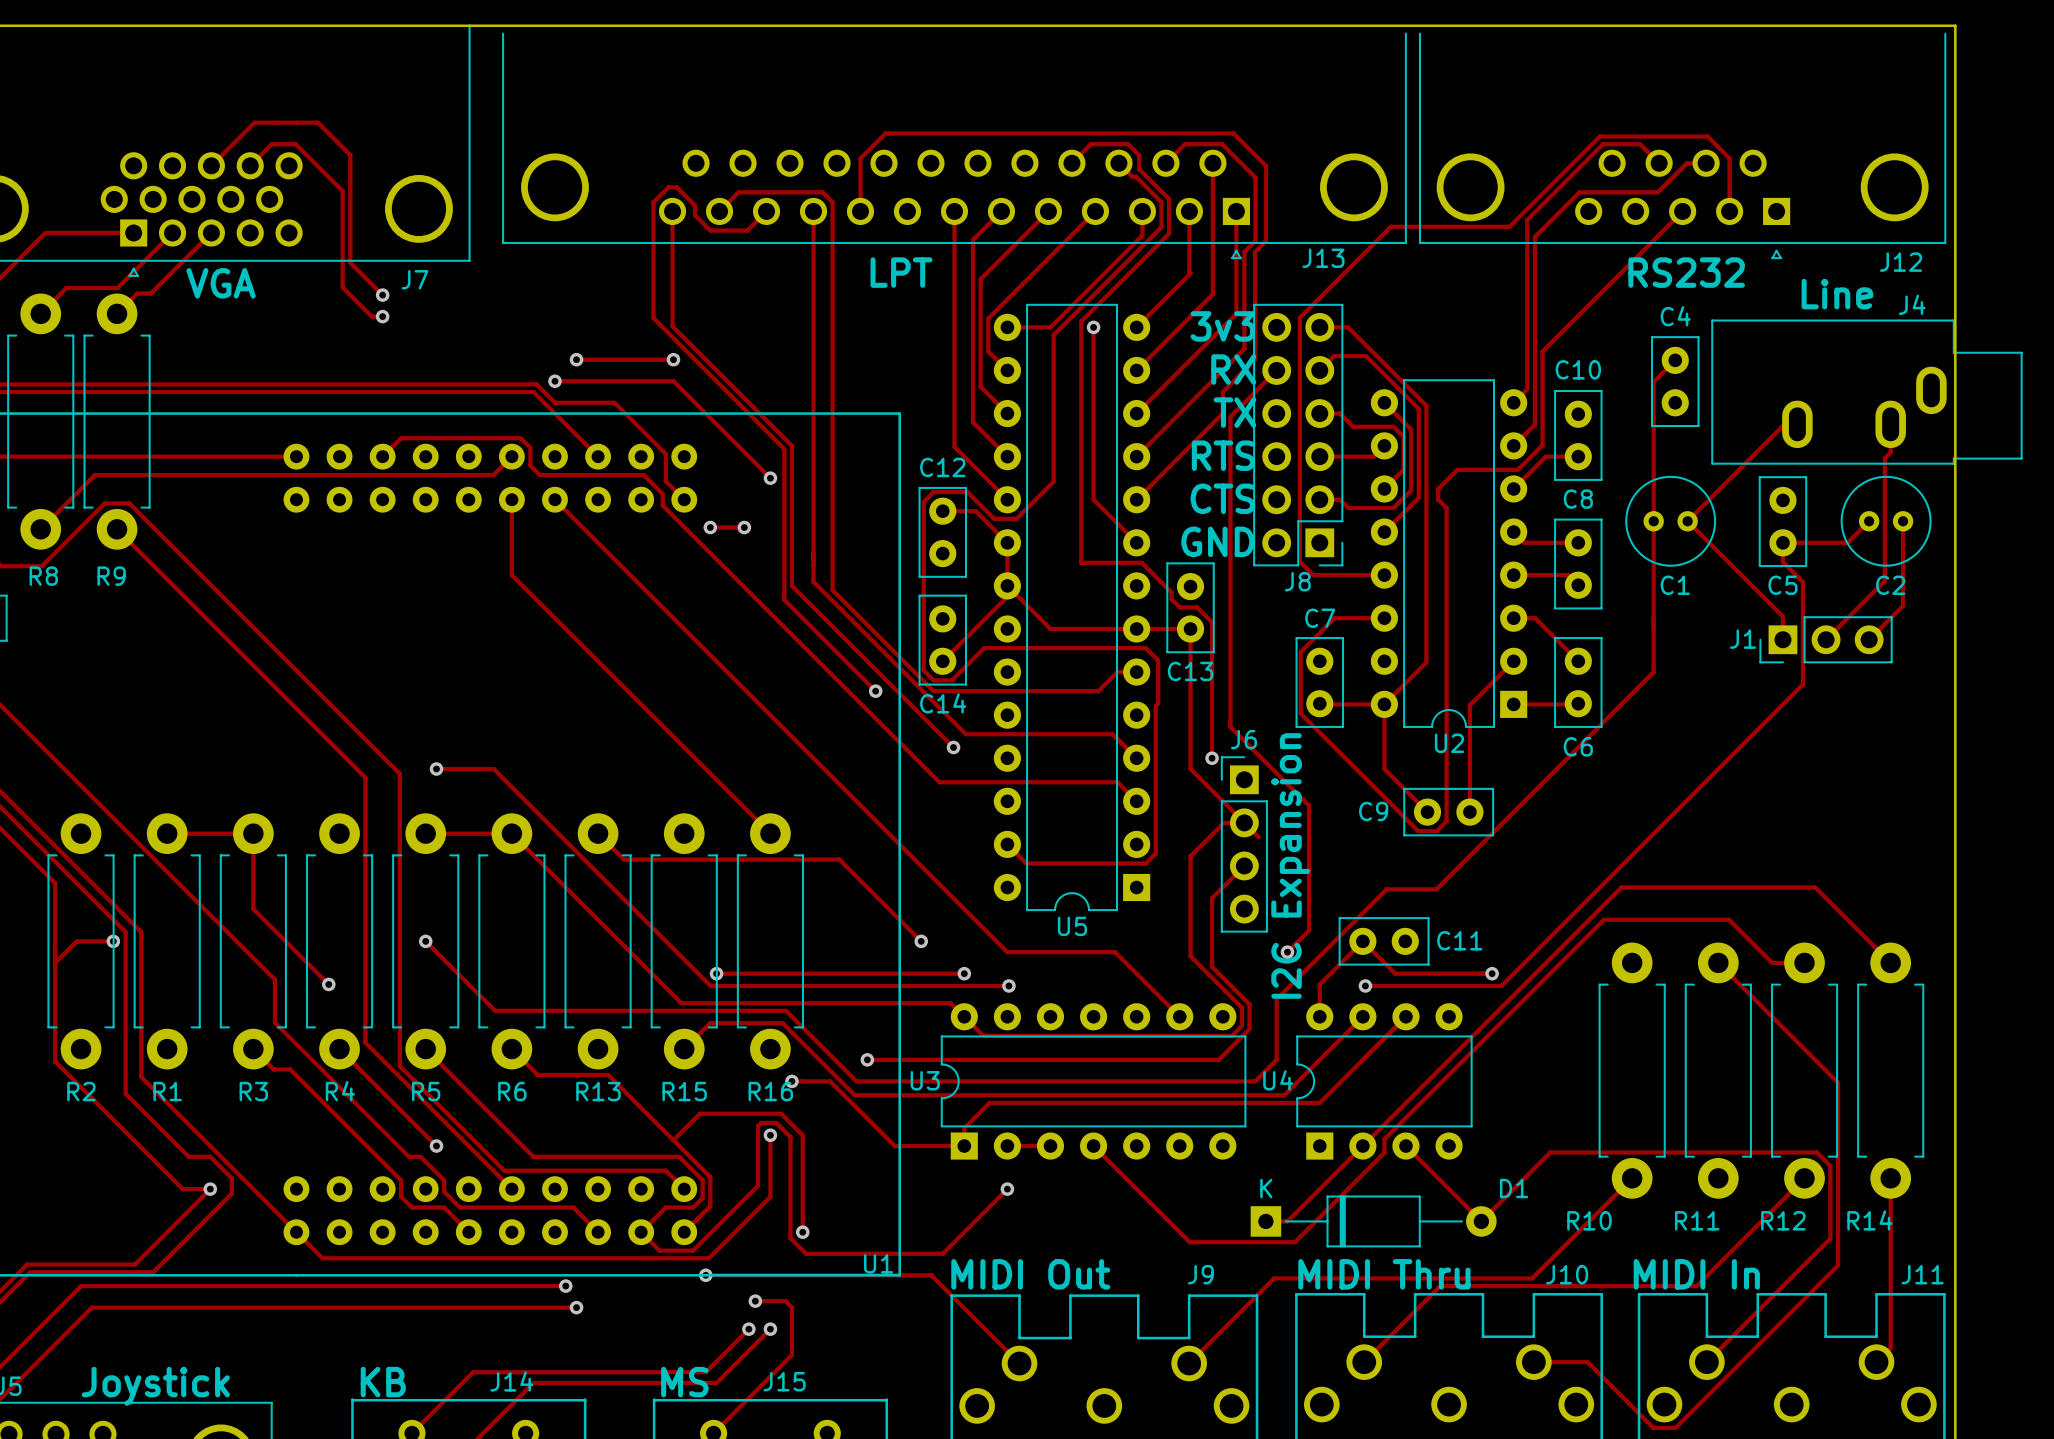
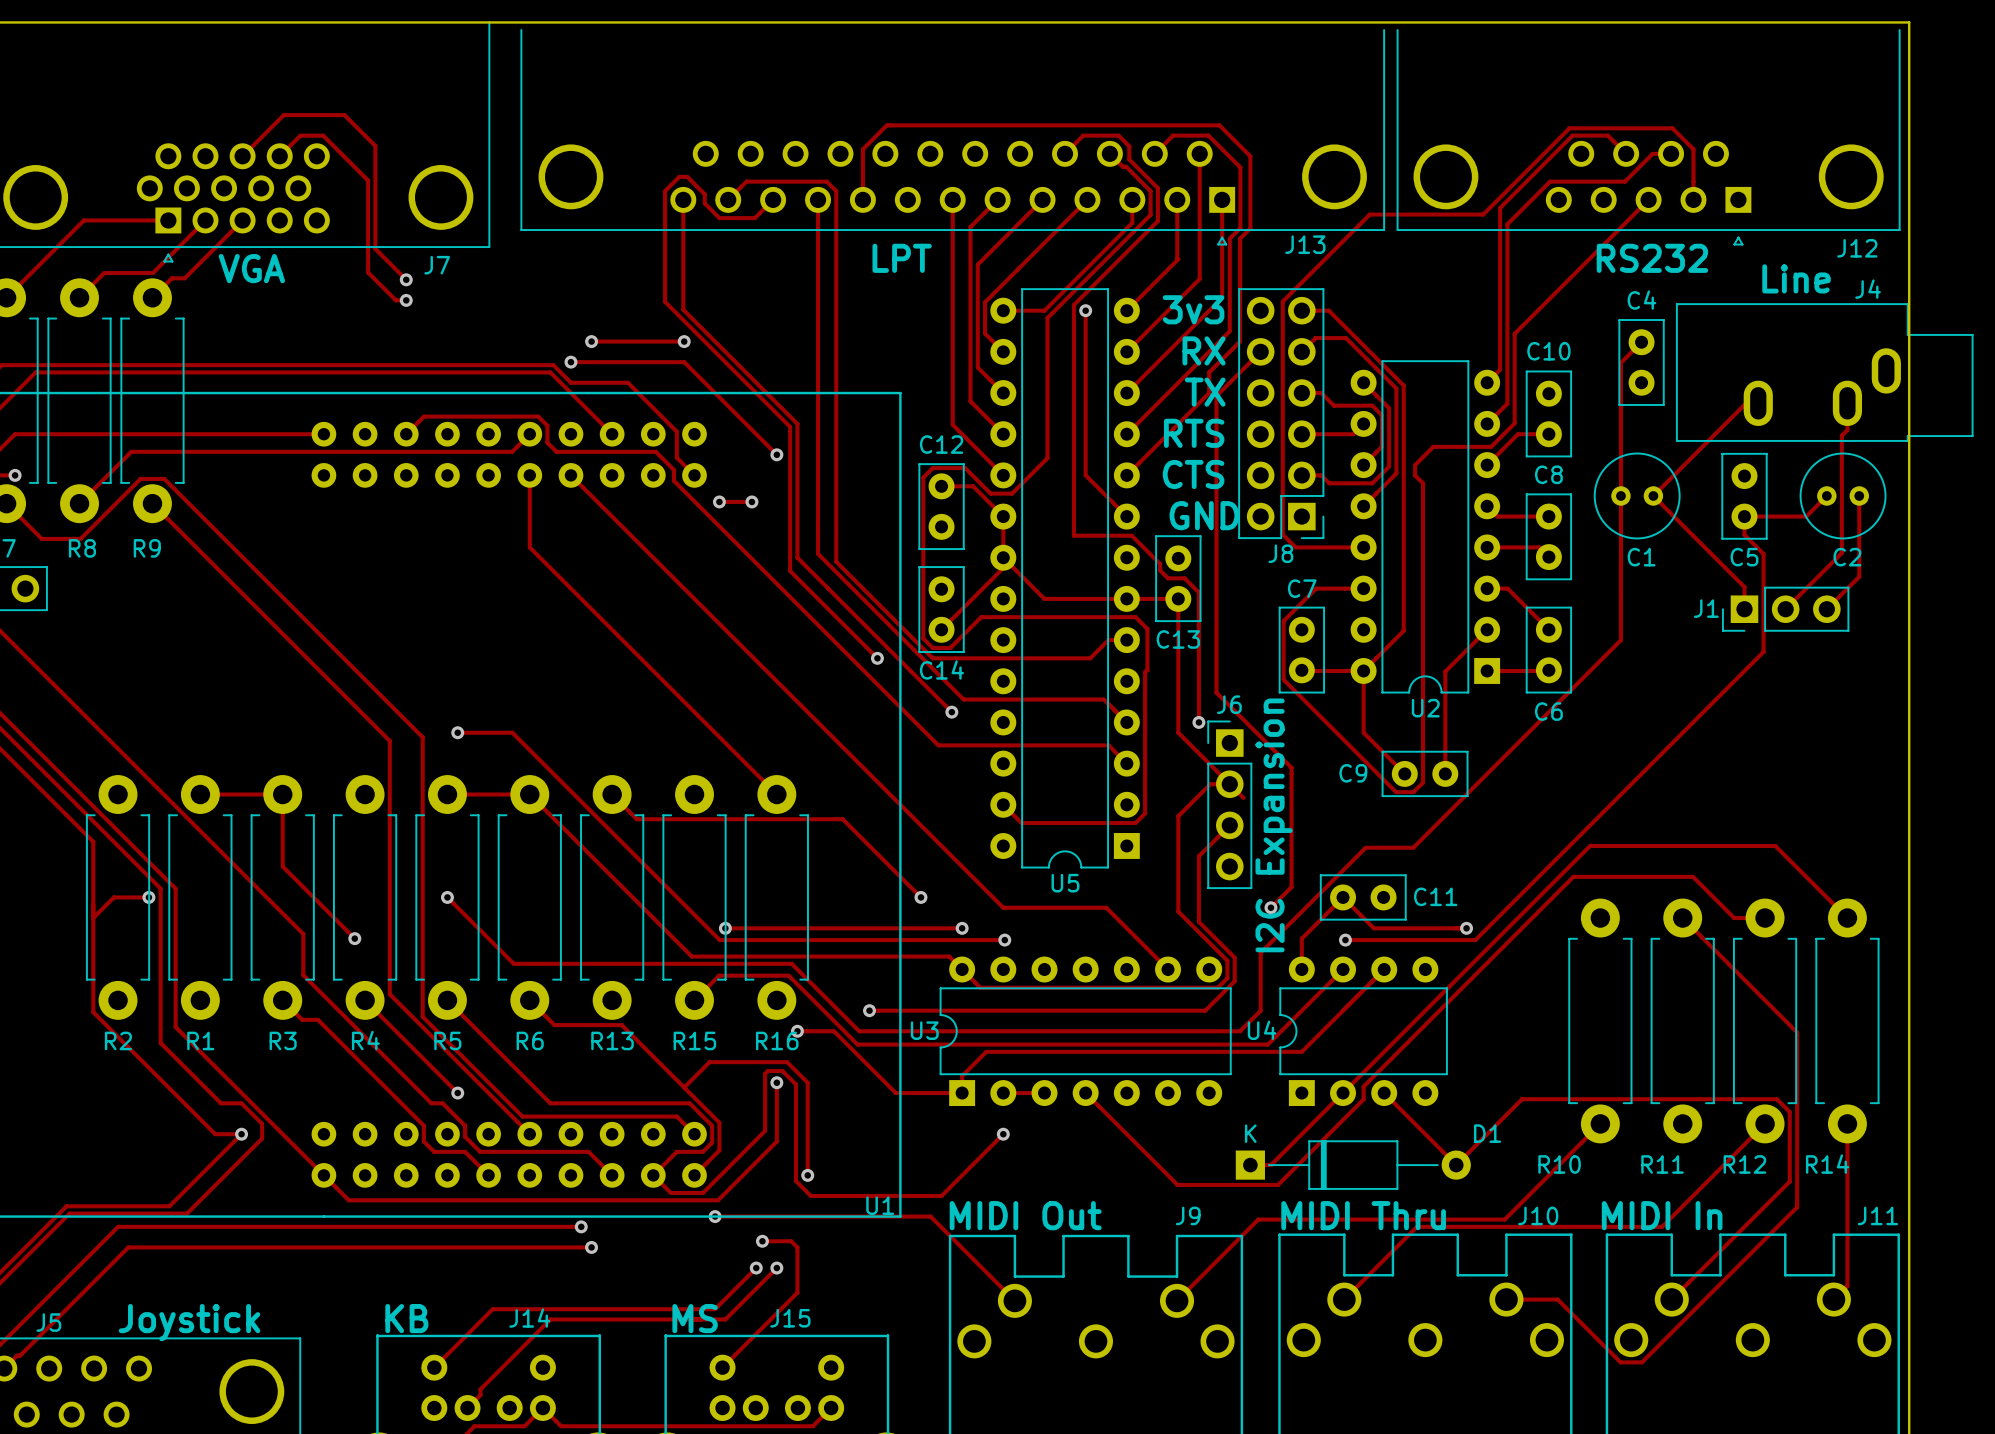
text position: 3v3 (1222, 326) -> 3v3 (1193, 309)
text position: RX (1233, 369) -> RX (1204, 350)
text position: TX (1234, 412) -> TX (1205, 392)
text position: RTS (1223, 455) -> RTS (1194, 433)
text position: CTS (1222, 498) -> CTS (1193, 474)

